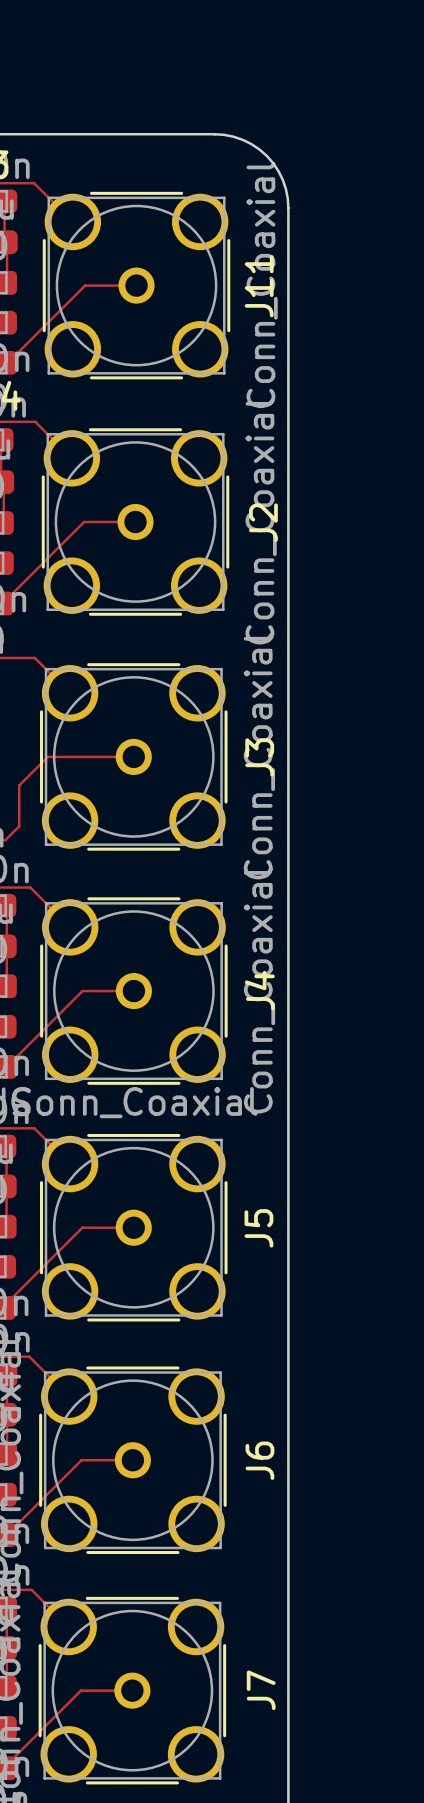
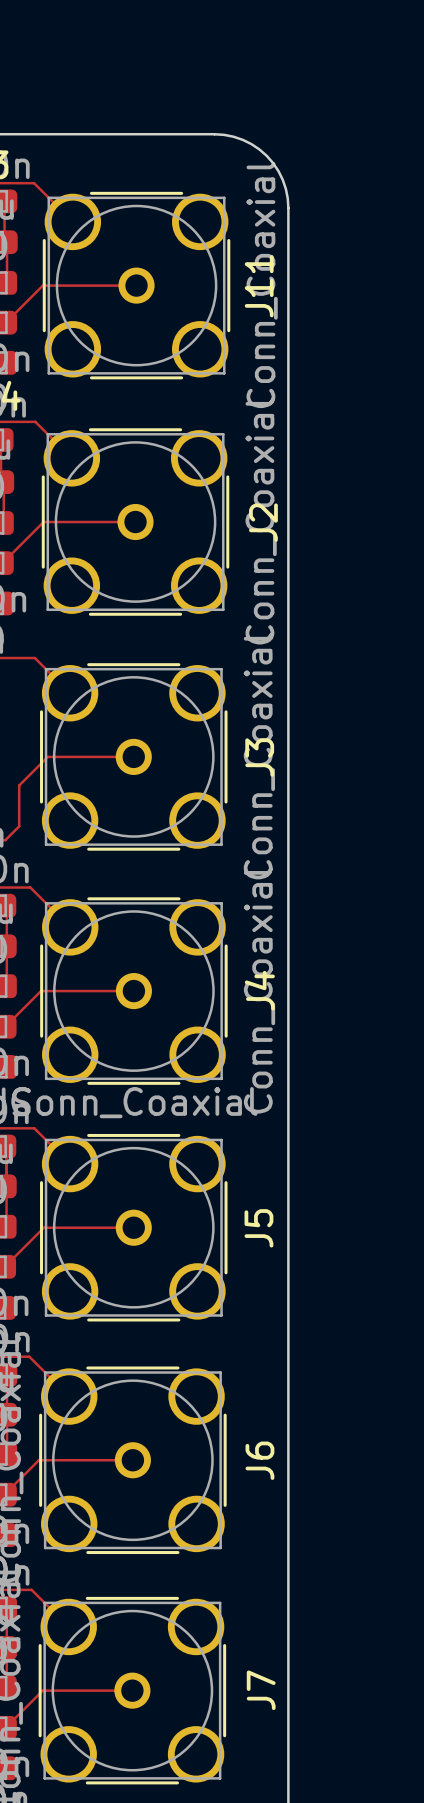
track: (85, 285) (7, 362) -> (85, 285) (42, 285) (5, 322)
track: (84, 522) (3, 603) -> (84, 522) (43, 522) (2, 563)
track: (82, 991) (7, 1066) -> (82, 991) (41, 991) (5, 1026)
track: (82, 1227) (5, 1304) (5, 1307) -> (82, 1227) (43, 1227) (4, 1266)
track: (81, 1460) (6, 1534) -> (81, 1460) (38, 1460) (5, 1493)
track: (80, 1690) (6, 1765) (6, 1768) -> (80, 1690) (42, 1690) (5, 1727)

